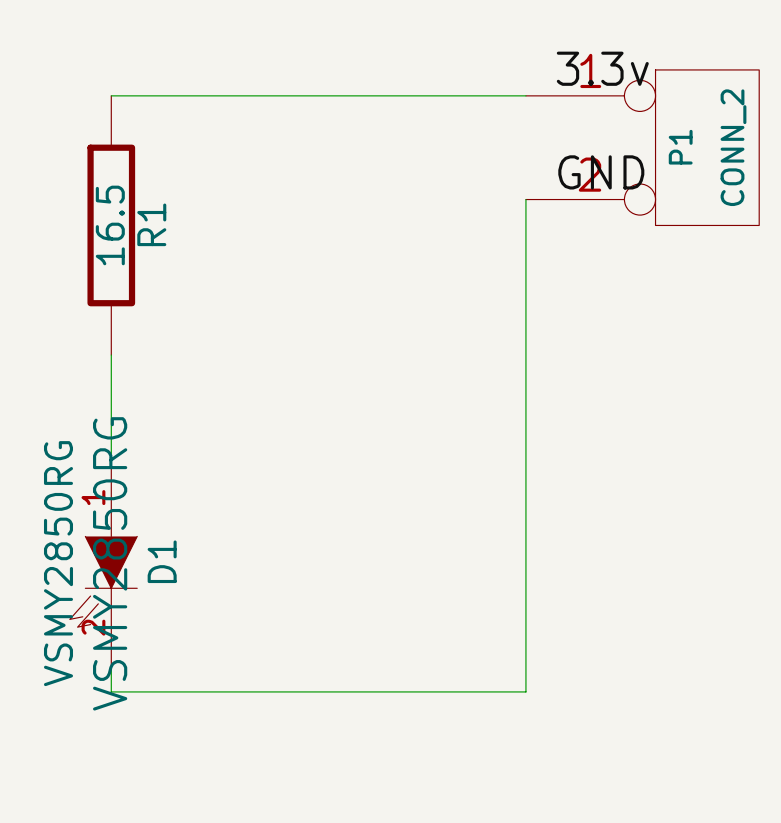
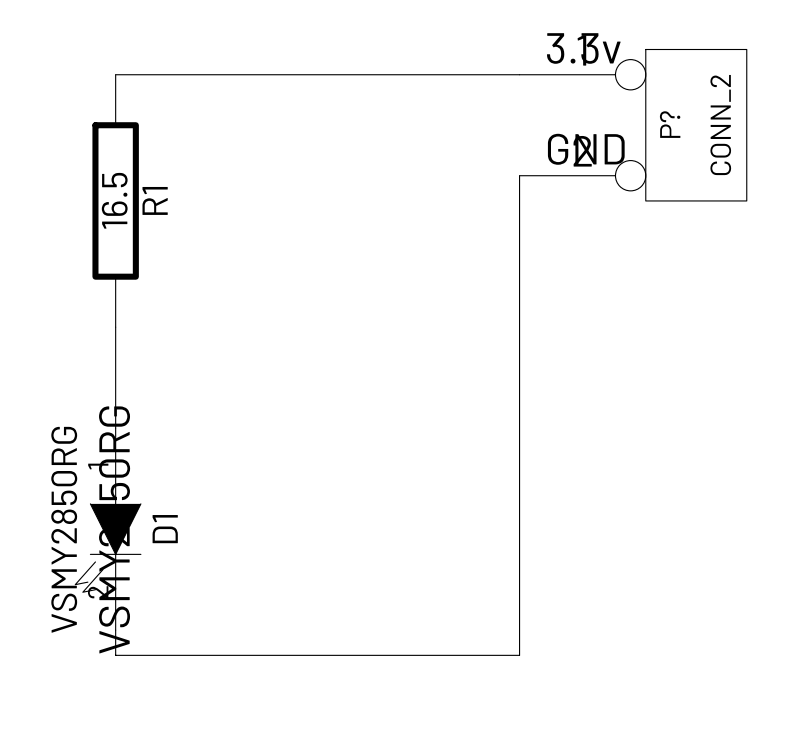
P1 name: P1 (680, 147) -> P? (670, 124)

